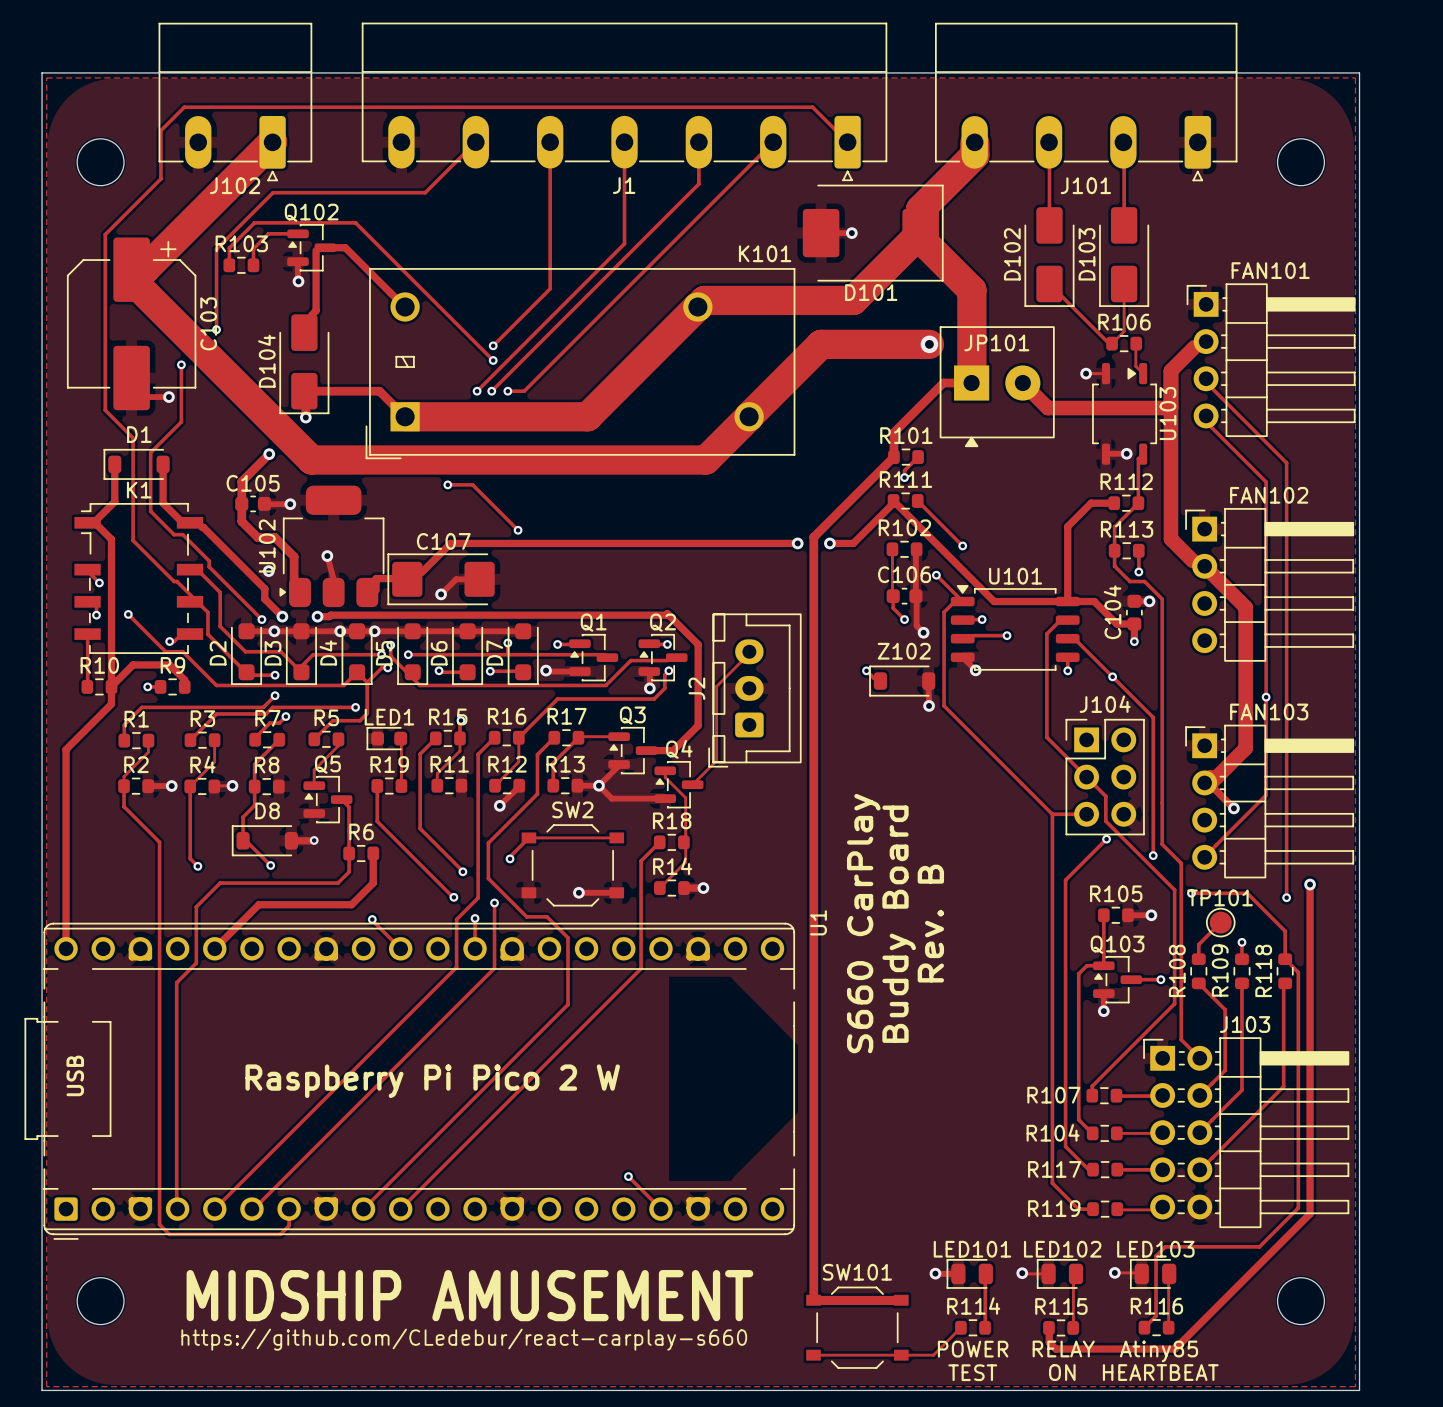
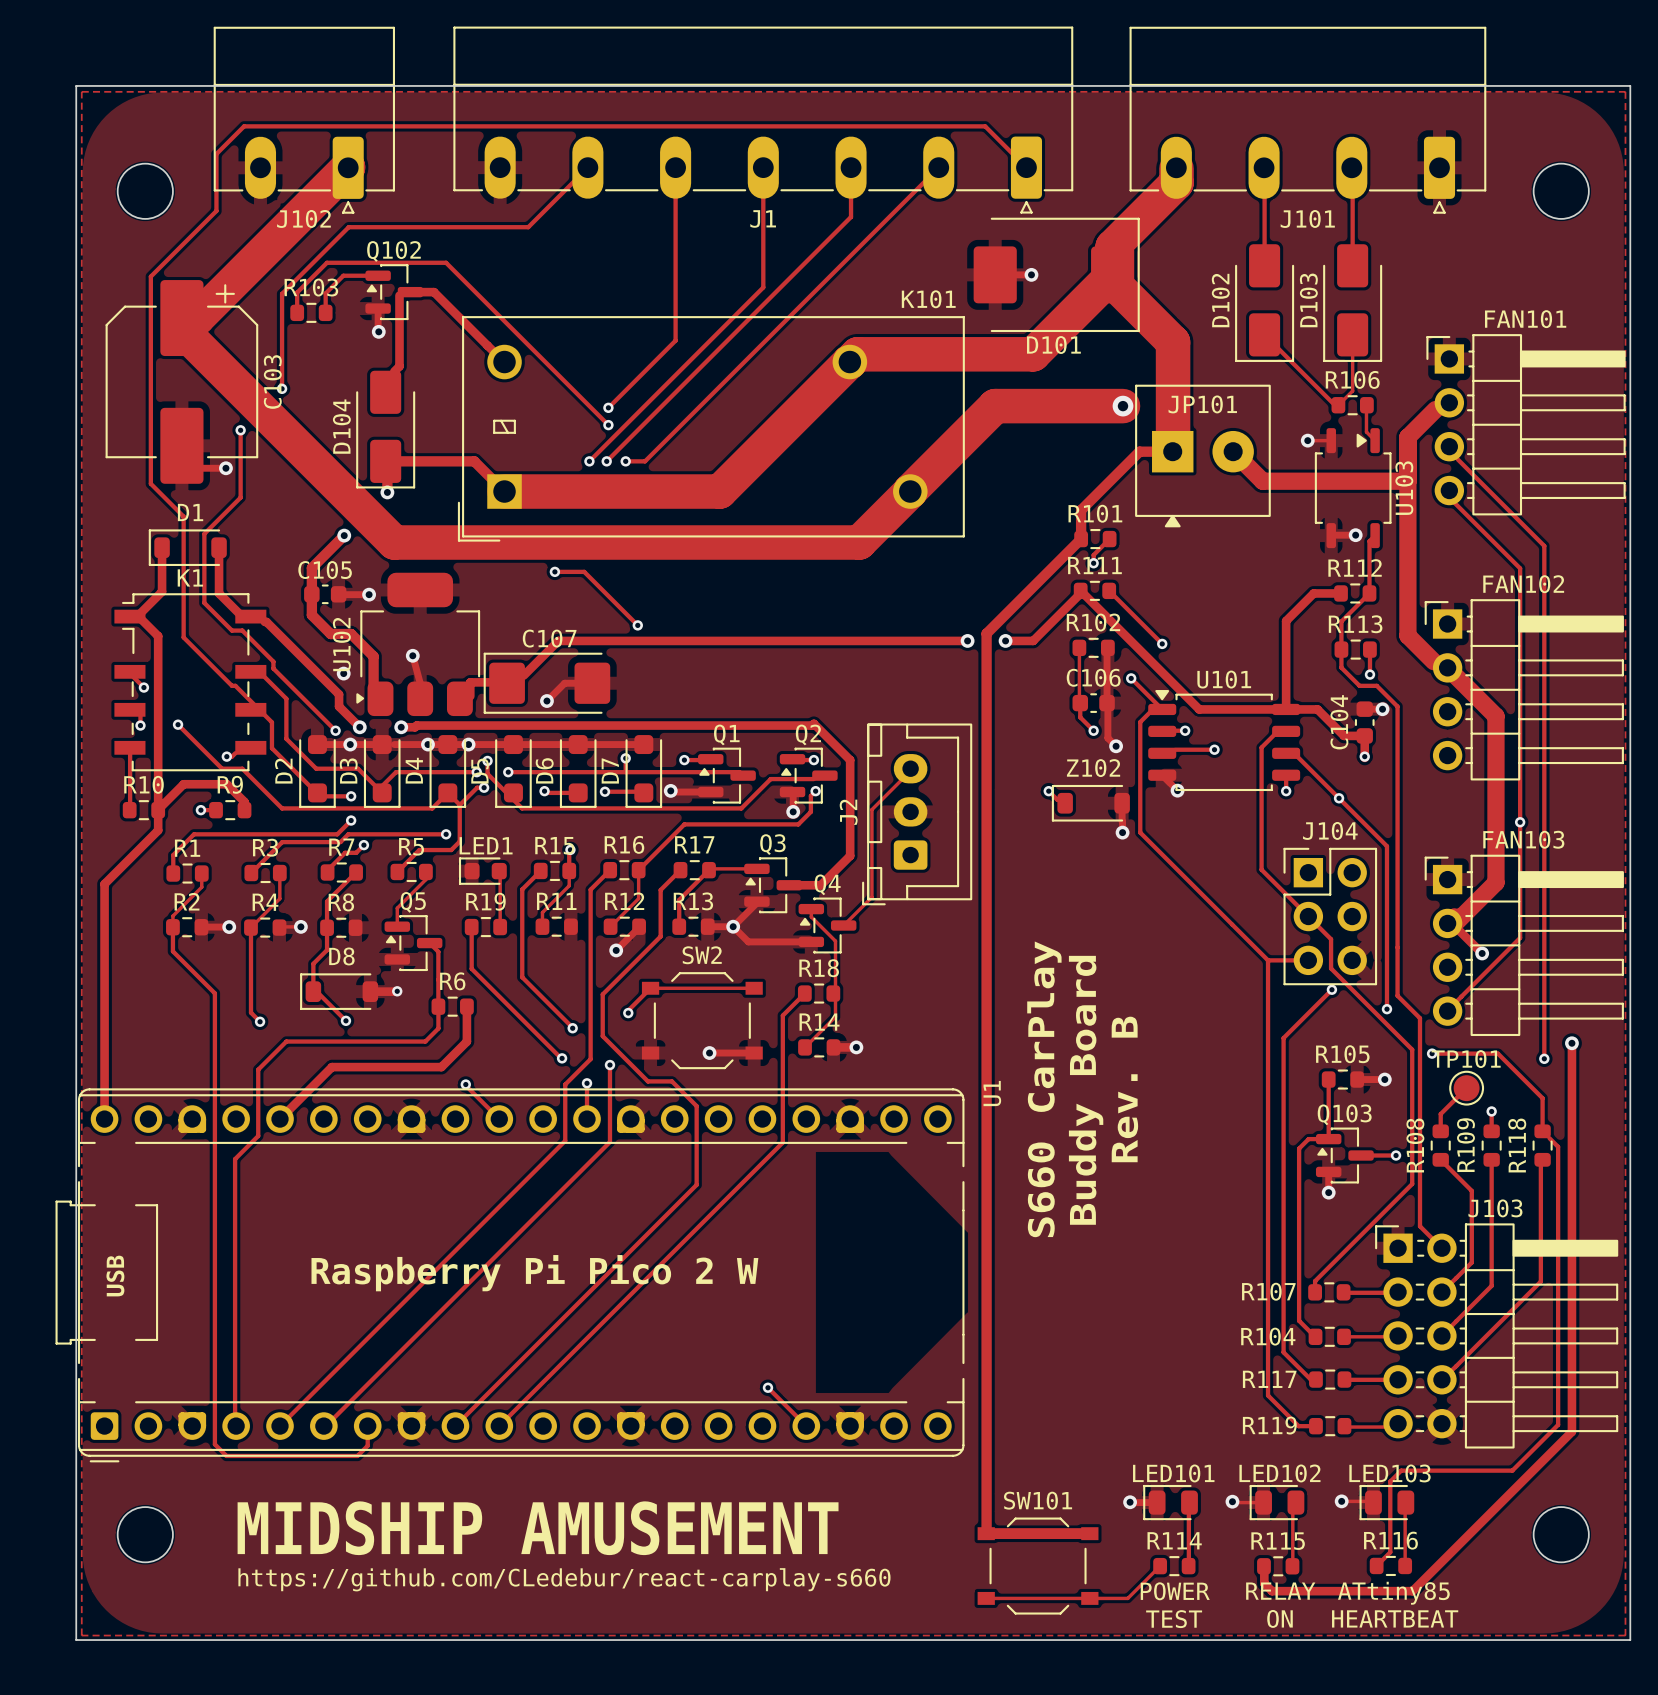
text: Atiny85 (1159, 1351) -> ATtiny85 (1393, 1593)

